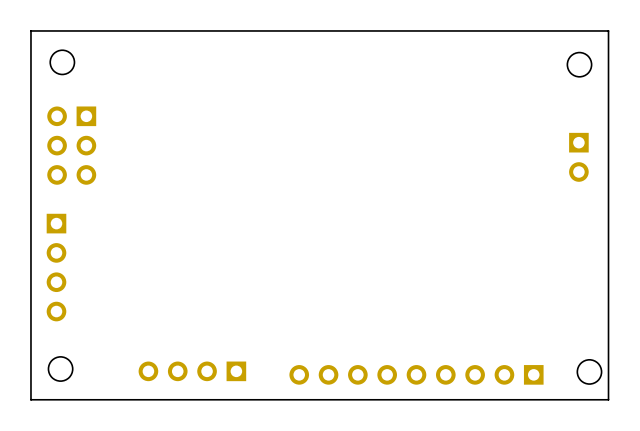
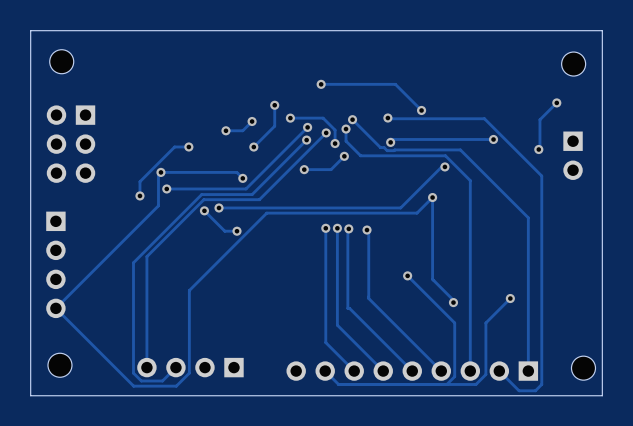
track: none -> (321, 84) (395, 84) (421, 110)
via: none -> (321, 84)
track: none -> (556, 102) (539, 119) (538, 149)
via: none -> (556, 102)
track: none -> (274, 105) (274, 126) (253, 147)
via: none -> (274, 105)
via: none -> (421, 110)
track: none -> (290, 118) (323, 118) (335, 130) (335, 143)
via: none -> (290, 118)
track: none -> (387, 118) (484, 118) (541, 176) (541, 384) (535, 390) (519, 390) (499, 371)
via: none -> (387, 118)
track: none -> (352, 119) (380, 147) (384, 147) (387, 150) (460, 149) (528, 217) (528, 371)
via: none -> (352, 119)
track: none -> (252, 121) (242, 130) (225, 130)
via: none -> (252, 121)
track: none -> (307, 127) (246, 188) (166, 188)
via: none -> (307, 127)
track: none -> (346, 129) (346, 141) (360, 155) (445, 155) (470, 180) (470, 371)
via: none -> (346, 129)
via: none -> (225, 130)
track: none -> (326, 132) (259, 199) (203, 199) (146, 256) (146, 367)
via: none -> (326, 132)
track: none -> (493, 139) (393, 139) (390, 142)
via: none -> (493, 139)
track: none -> (306, 140) (252, 194) (201, 194) (133, 262) (133, 373) (141, 381) (162, 381) (175, 367)
via: none -> (306, 140)
via: none -> (390, 142)
via: none -> (335, 143)
track: none -> (188, 146) (174, 146) (139, 181) (139, 195)
via: none -> (188, 146)
via: none -> (253, 147)
via: none -> (538, 149)
track: none -> (344, 156) (331, 169) (304, 169)
via: none -> (344, 156)
track: none -> (444, 166) (441, 166) (400, 207) (219, 207)
via: none -> (444, 166)
via: none -> (304, 169)
via: none -> (160, 172)
track: none -> (242, 178) (236, 172) (160, 172) (158, 174) (158, 205) (55, 308) (133, 386) (176, 386) (189, 373) (189, 290) (266, 213) (417, 213) (432, 197) (432, 279) (453, 300) (453, 302)
via: none -> (242, 178)
via: none -> (166, 188)
via: none -> (139, 195)
via: none -> (432, 197)
via: none -> (219, 207)
track: none -> (204, 210) (224, 231) (236, 231)
via: none -> (204, 210)
track: none -> (325, 228) (325, 342) (354, 371)
via: none -> (325, 228)
track: none -> (337, 228) (337, 325) (383, 371)
via: none -> (337, 228)
track: none -> (348, 228) (347, 308) (412, 371)
via: none -> (348, 228)
track: none -> (367, 230) (368, 231) (368, 298) (441, 371)
via: none -> (367, 230)
via: none -> (236, 231)
track: none -> (407, 275) (454, 322) (454, 376) (446, 384)
via: none -> (407, 275)
track: none -> (510, 298) (485, 322) (485, 374) (475, 384) (338, 384) (325, 371)
via: none -> (510, 298)
via: none -> (453, 302)

